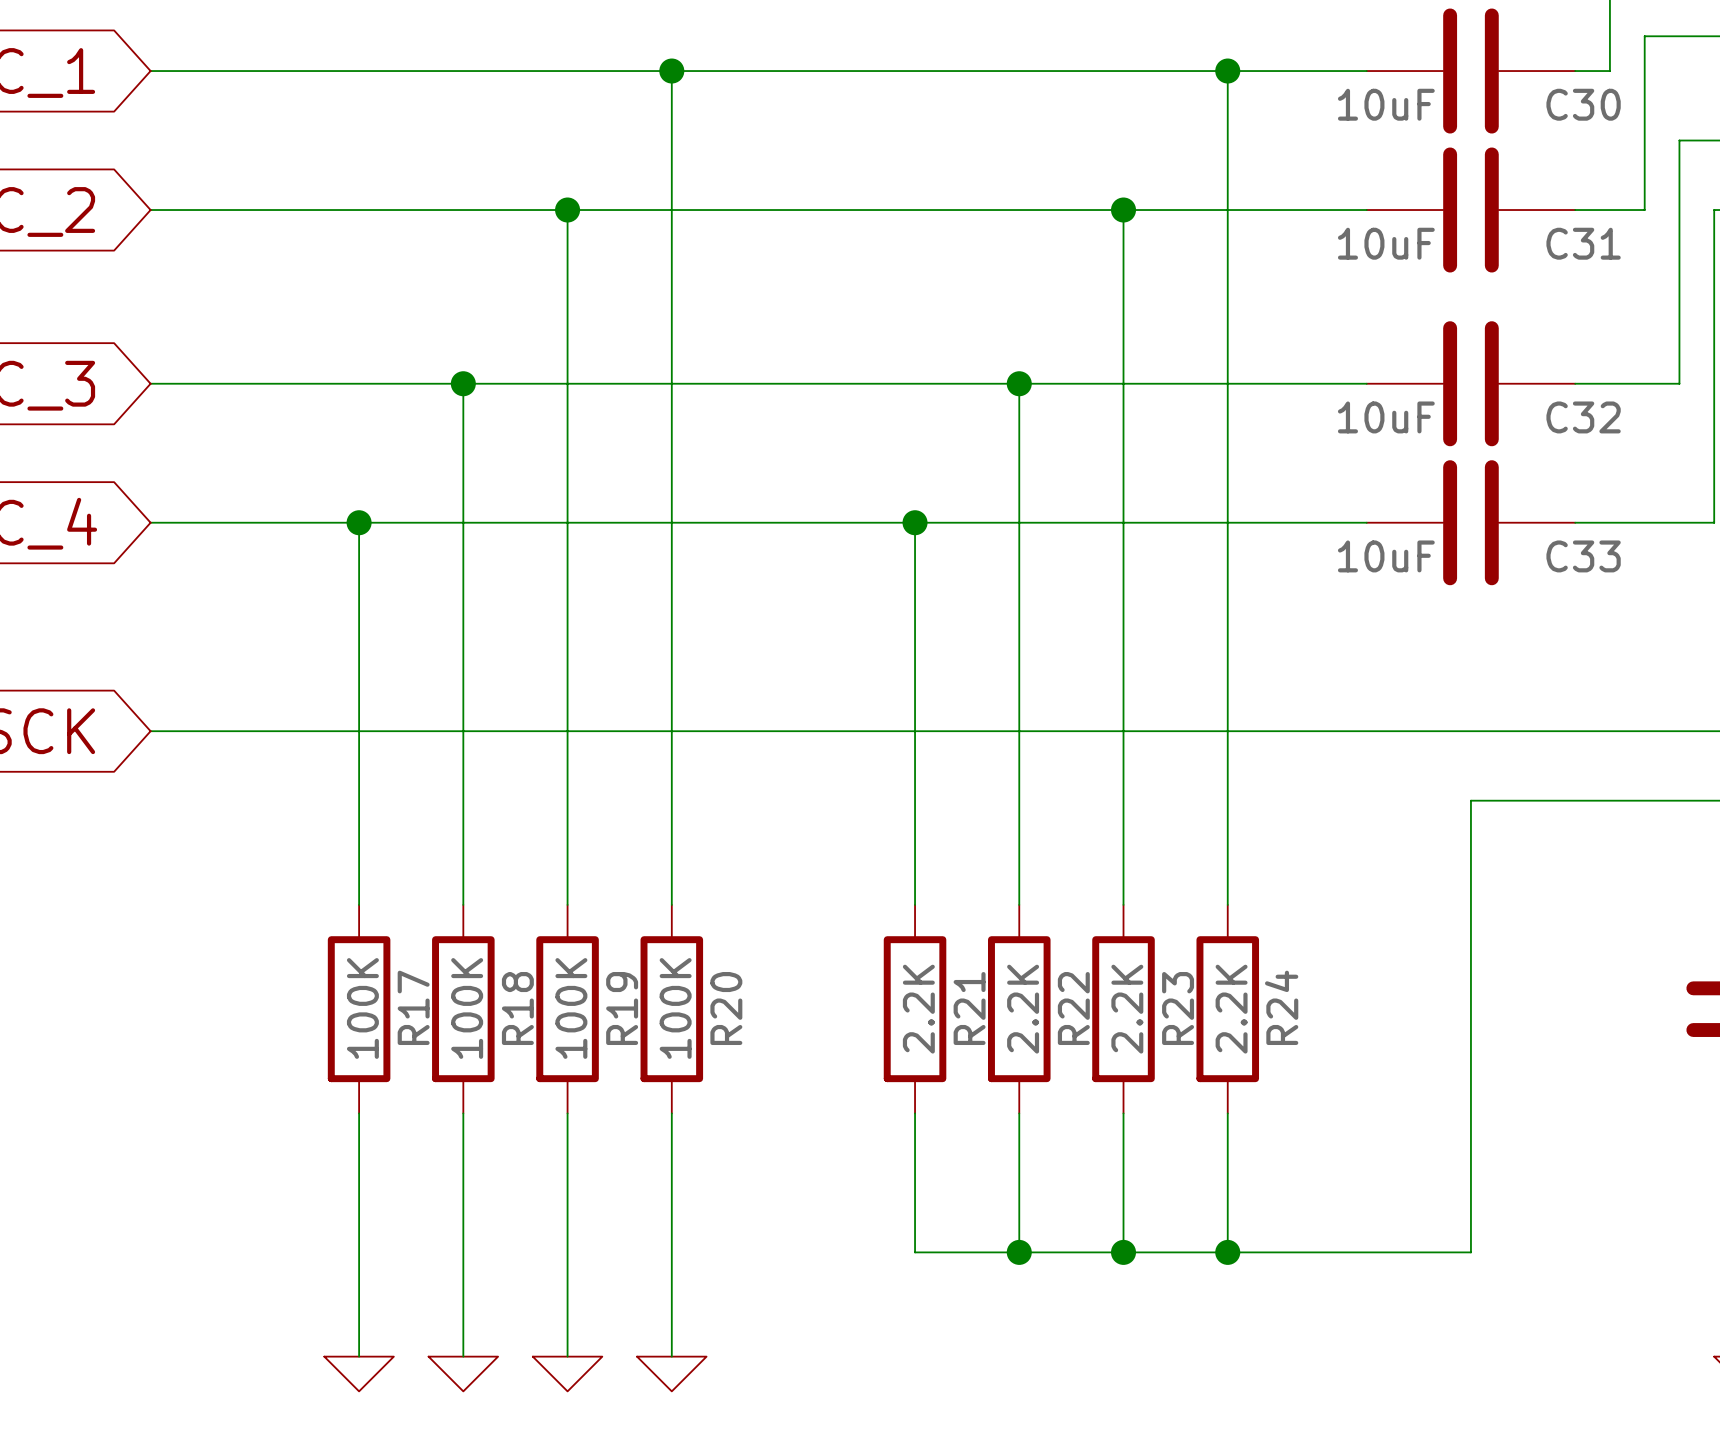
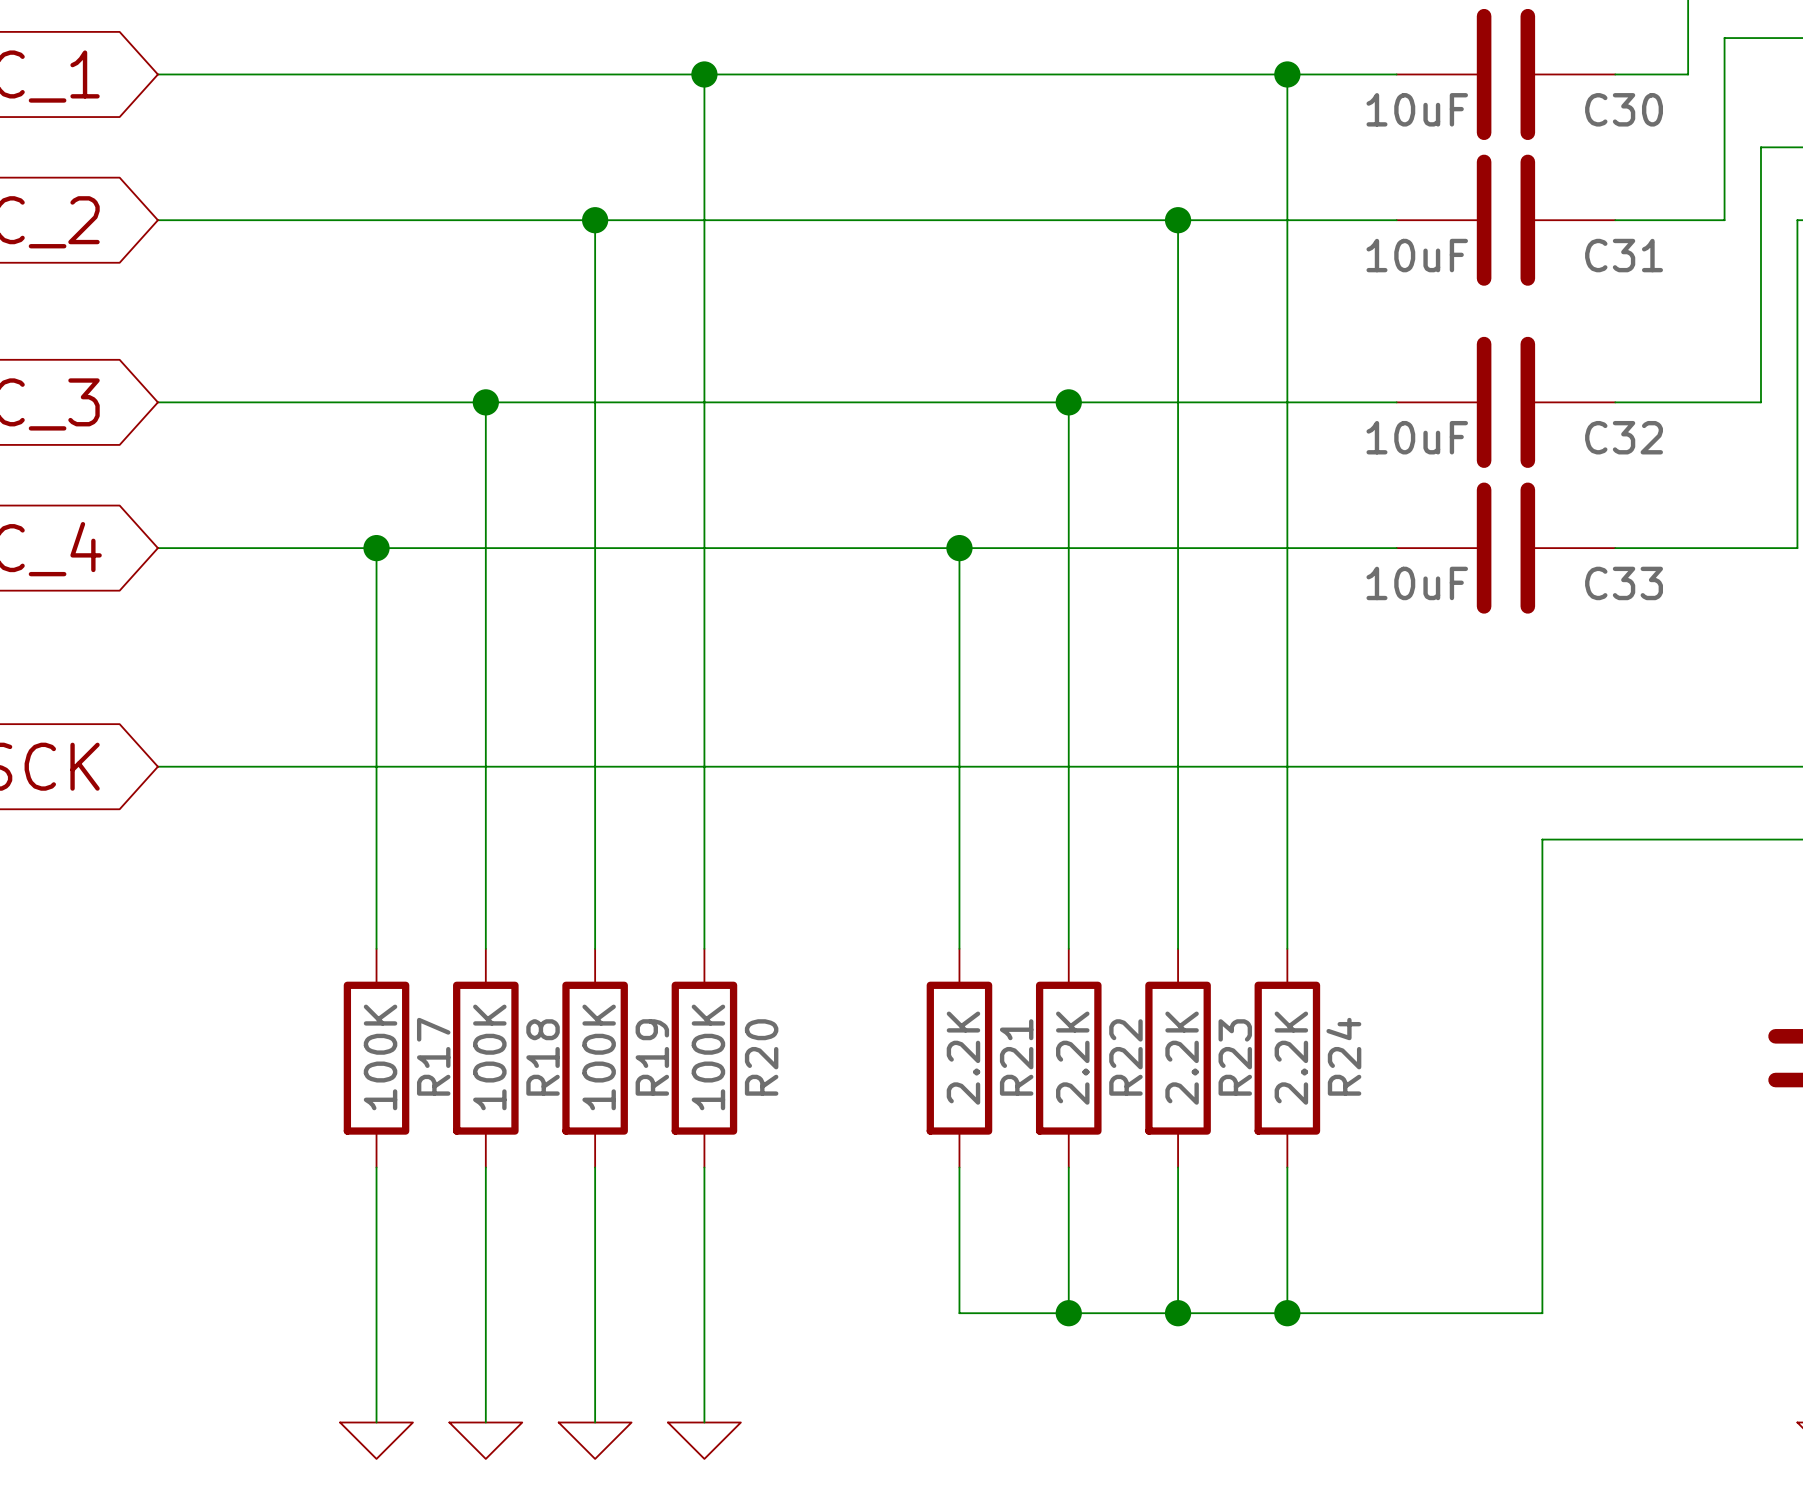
C30 position: (1470, 71) -> (1505, 74)
C31 position: (1470, 210) -> (1505, 220)
C32 position: (1470, 383) -> (1505, 402)
C33 position: (1470, 522) -> (1505, 548)

